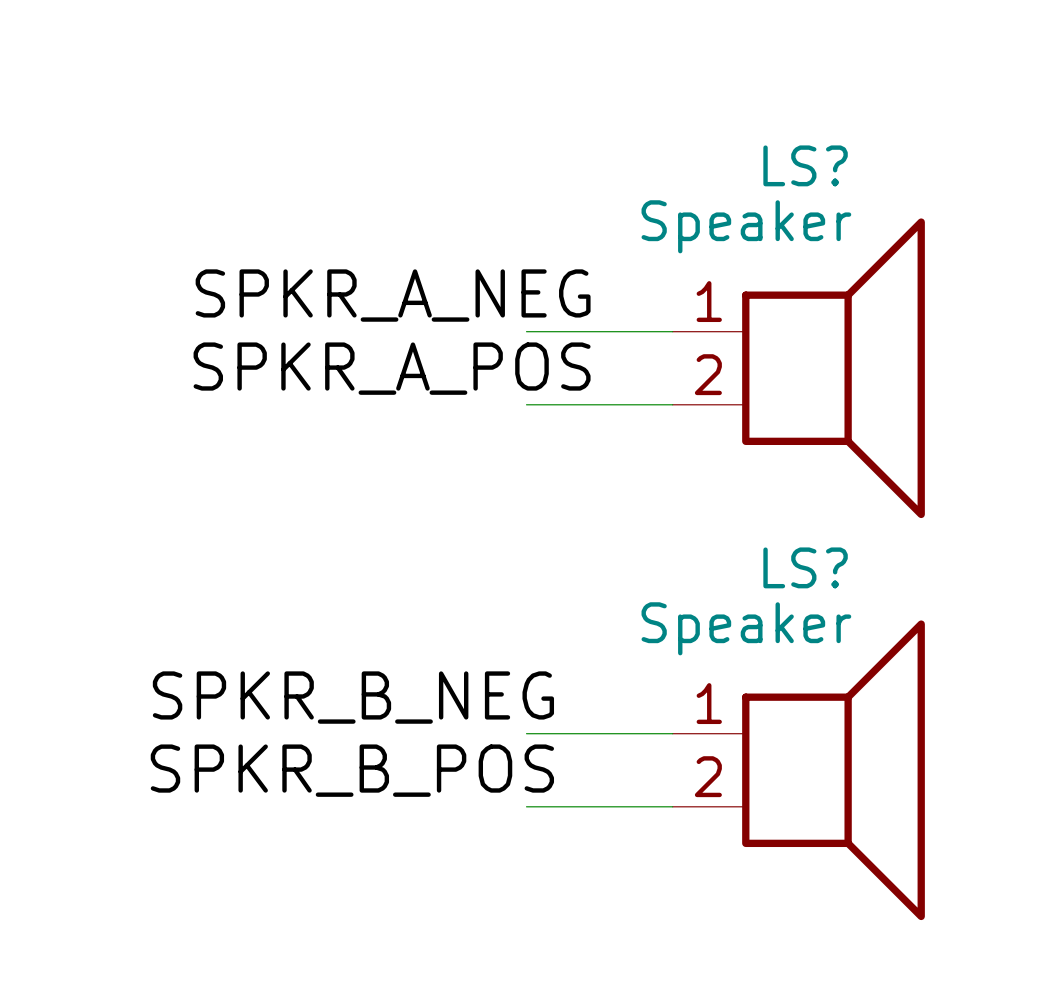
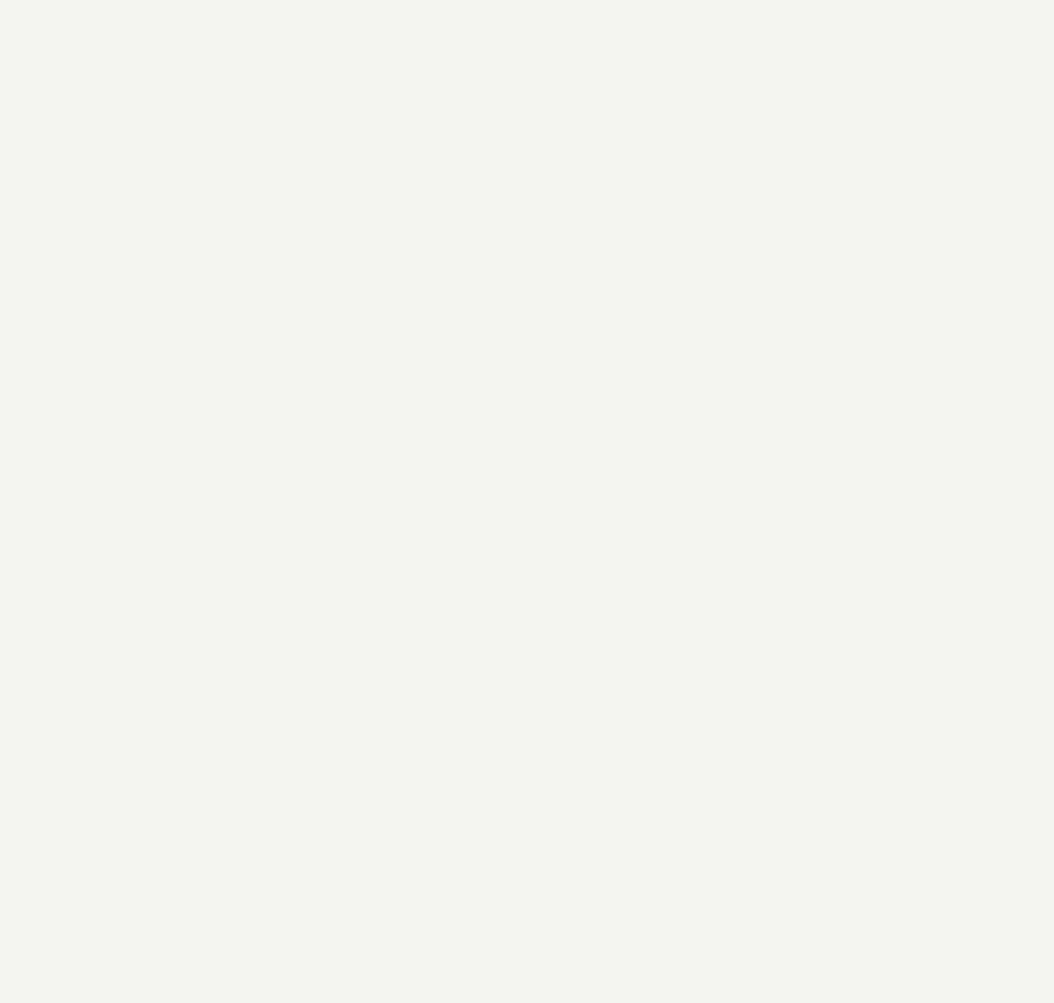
label: SPKR_A_NEG (393, 295) -> none
wire: (526, 331) (672, 331) -> none
label: SPKR_A_POS (392, 368) -> none
LS?: Speaker (798, 368) -> none
wire: (526, 404) (672, 404) -> none
label: SPKR_B_NEG (353, 697) -> none
wire: (526, 733) (672, 733) -> none
label: SPKR_B_POS (352, 770) -> none
LS?: Speaker (798, 770) -> none
wire: (526, 806) (672, 806) -> none

